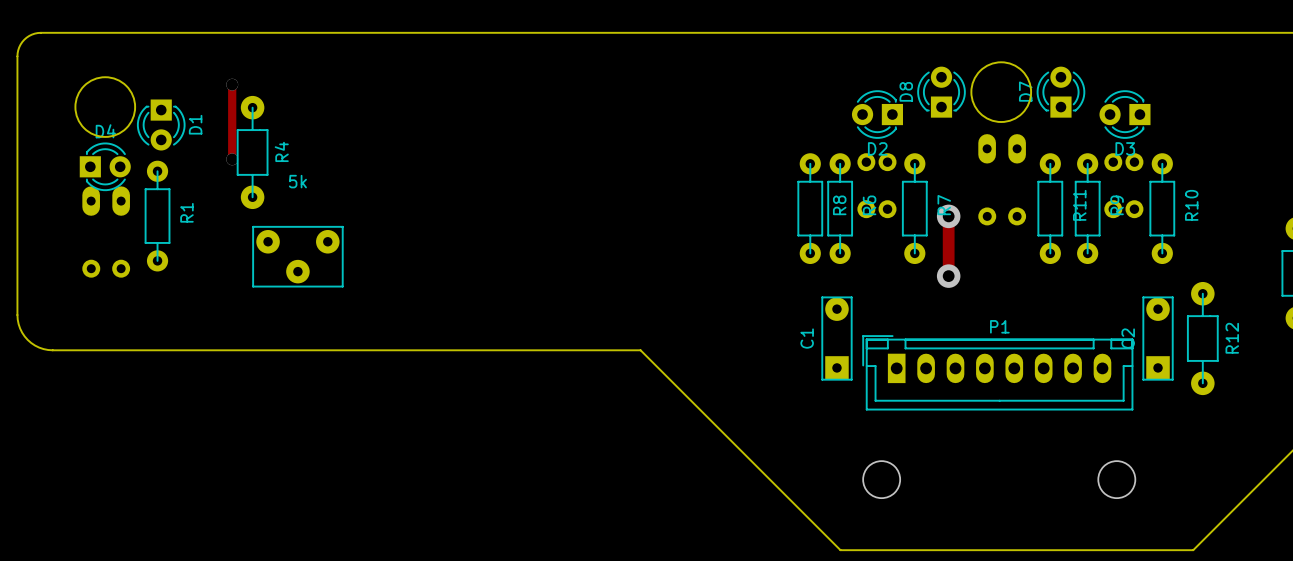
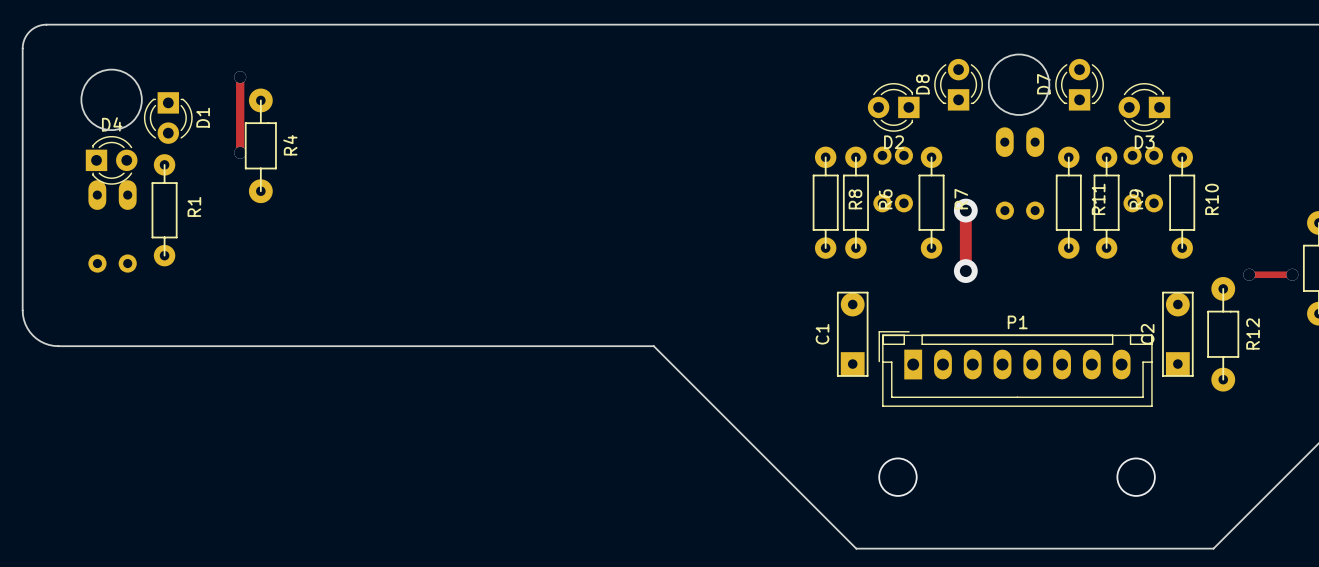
part: 5k (297, 256) -> none
track: none -> (1249, 274) (1292, 274)
via: none -> (1249, 274)
via: none -> (1292, 274)

